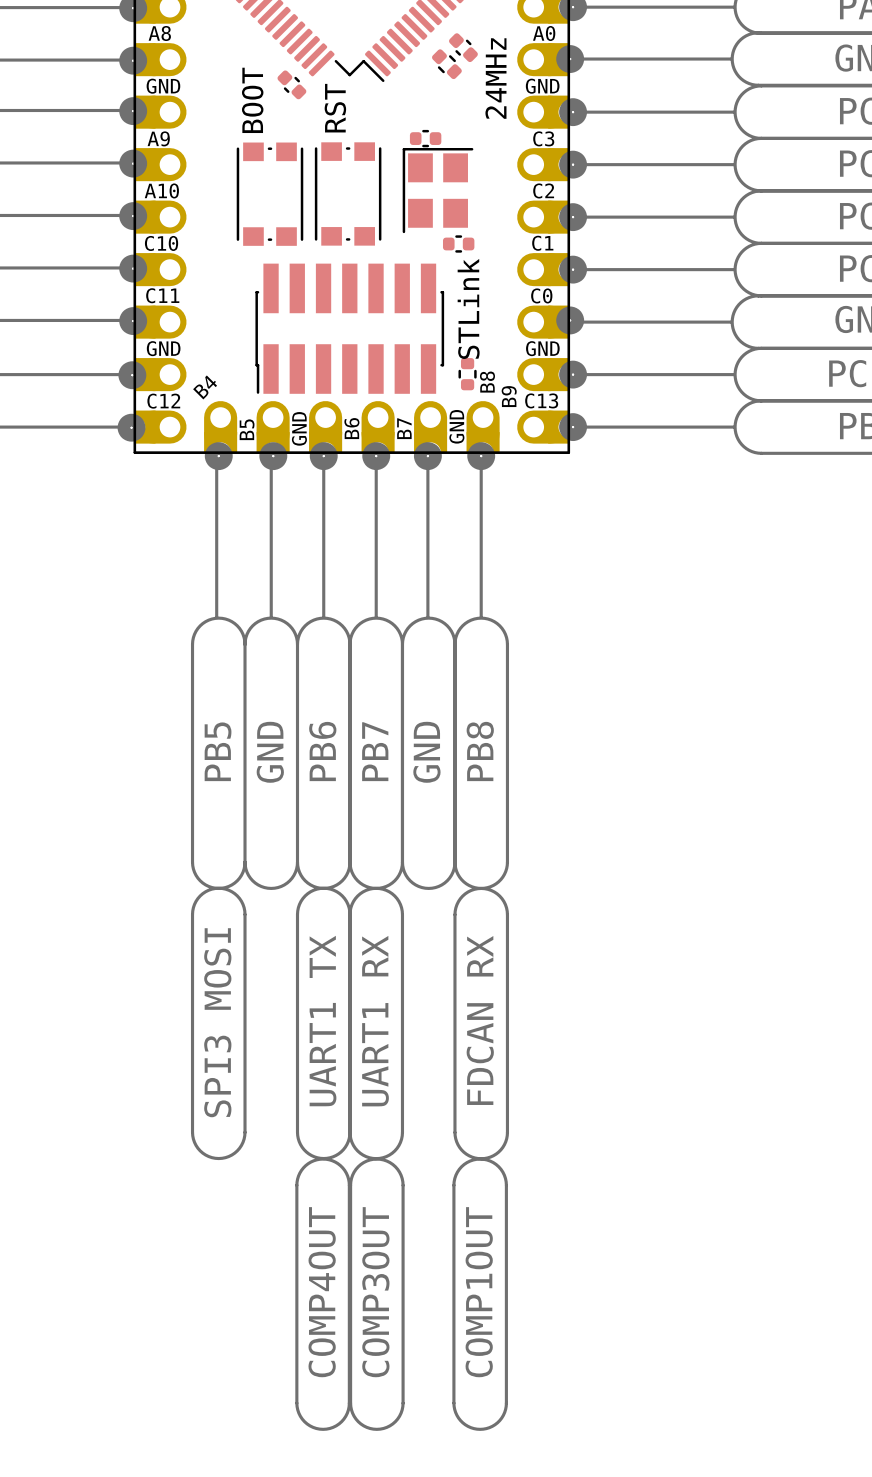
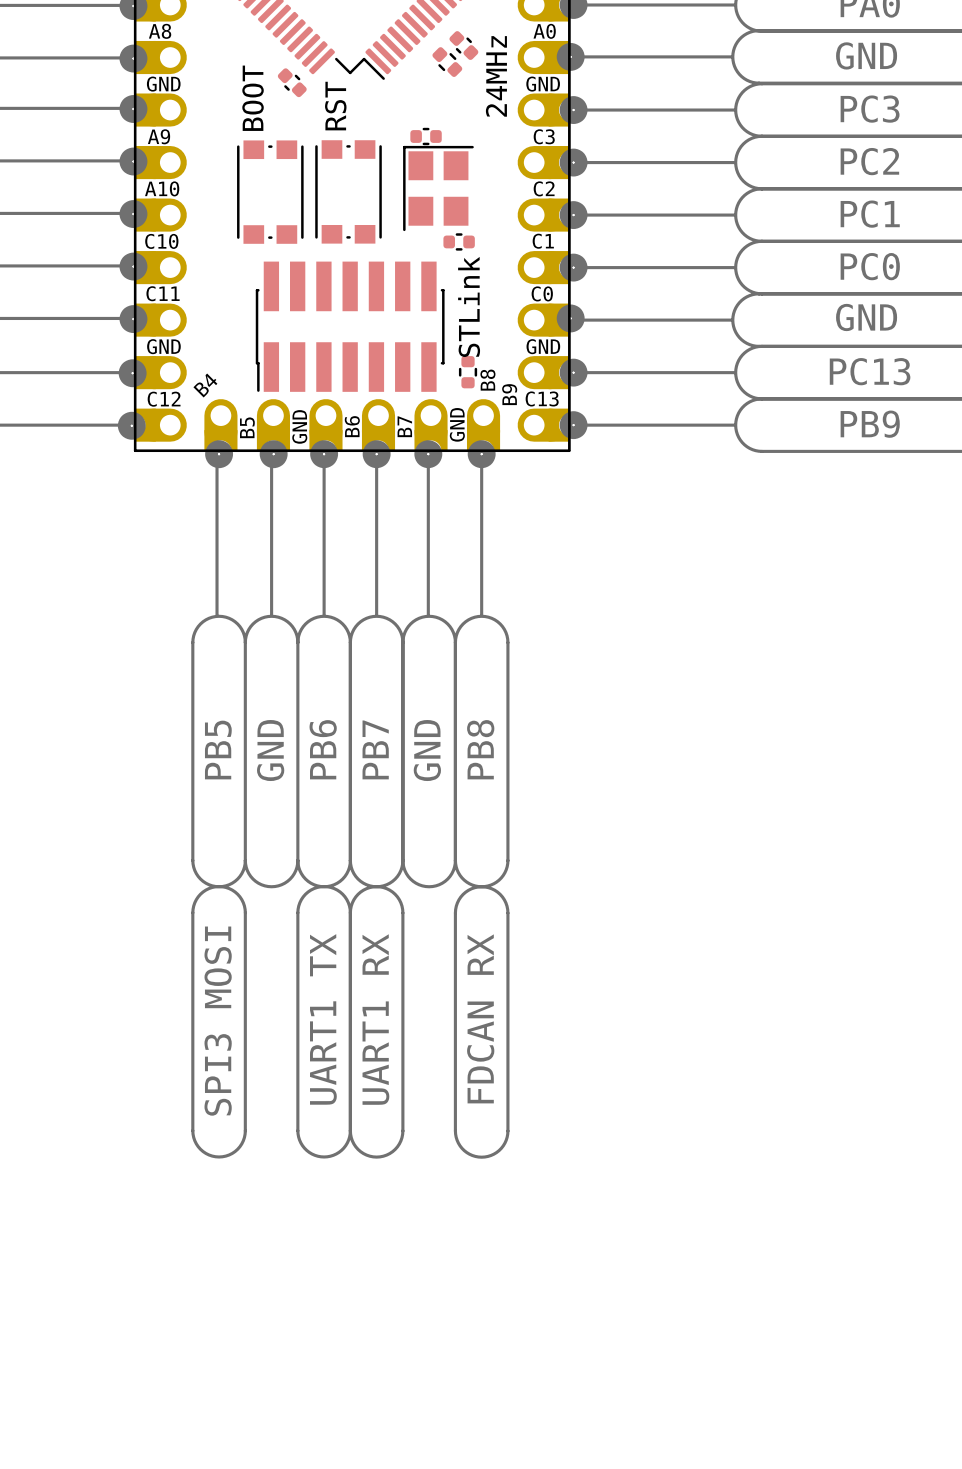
text: COMP4OUT (322, 1292) -> none
text: COMP3OUT (375, 1292) -> none
text: COMP1OUT (479, 1292) -> none
line: (349, 1403) (349, 1406) (347, 1413) (343, 1419) (336, 1425) (326, 1429) (316, 1428) (307, 1423) (300, 1416) (297, 1406) (297, 1182) (299, 1173) (305, 1165) (319, 1159) (332, 1160) (340, 1165) (346, 1173) (349, 1182) (349, 1185) (349, 1403) -> none
line: (403, 1403) (402, 1406) (401, 1413) (397, 1419) (389, 1425) (380, 1429) (370, 1428) (360, 1423) (354, 1416) (350, 1406) (350, 1181) (358, 1166) (373, 1159) (383, 1159) (392, 1164) (399, 1172) (402, 1181) (403, 1185) (403, 1403) -> none
line: (506, 1403) (506, 1406) (504, 1412) (499, 1420) (492, 1426) (483, 1429) (473, 1428) (465, 1424) (458, 1418) (454, 1406) (454, 1181) (461, 1166) (476, 1159) (486, 1159) (496, 1164) (502, 1172) (506, 1181) (506, 1185) (506, 1403) -> none

